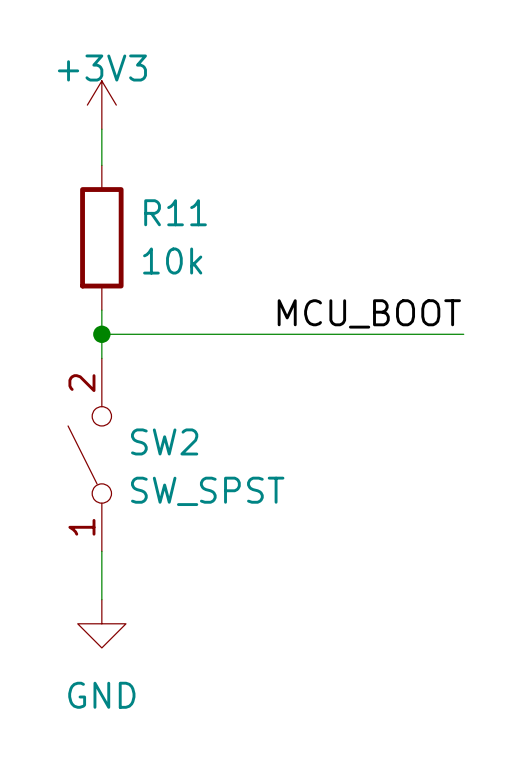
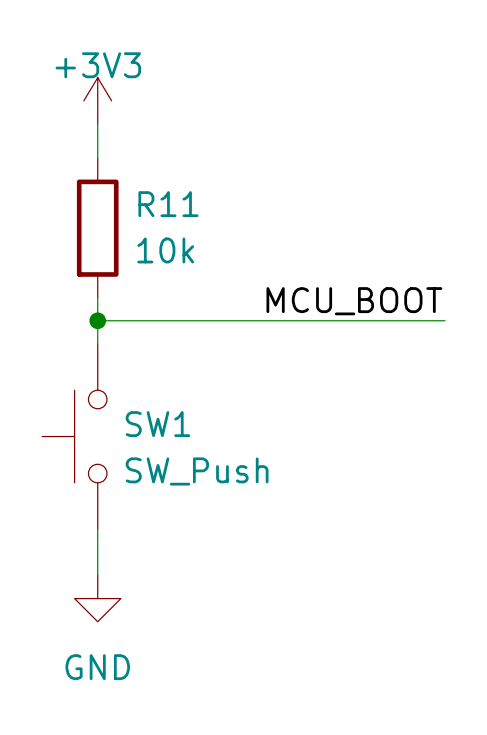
SW1: none -> SW_Push (74, 436)
SW2: SW_SPST (89, 454) -> none

